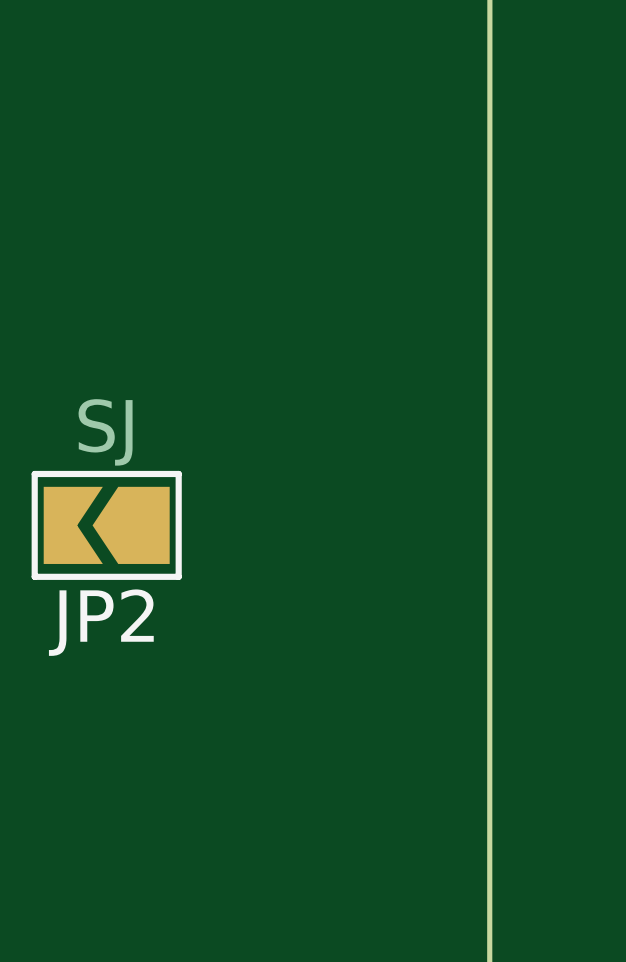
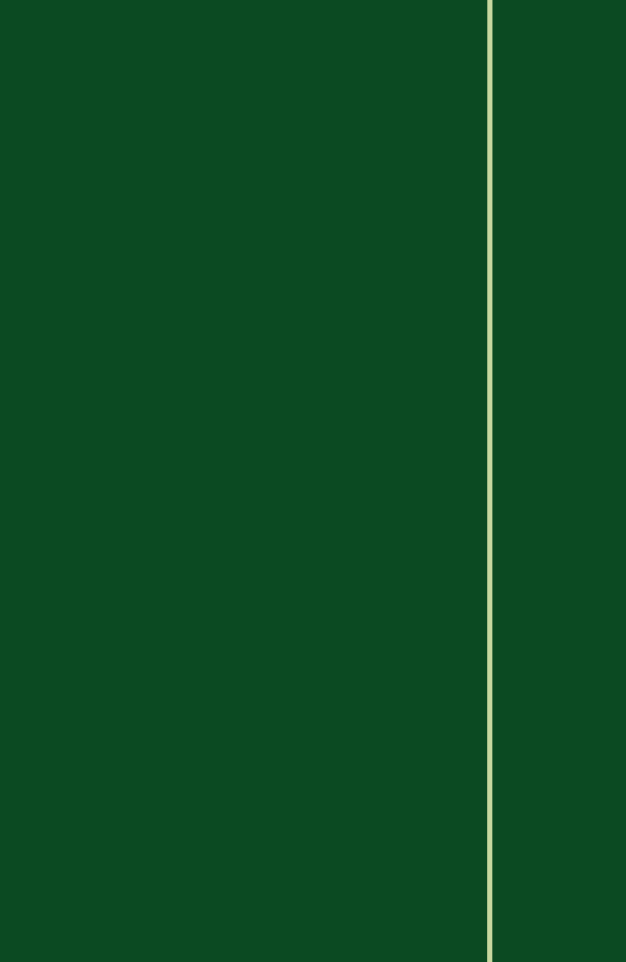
JP2: SJ (106, 525) -> none

